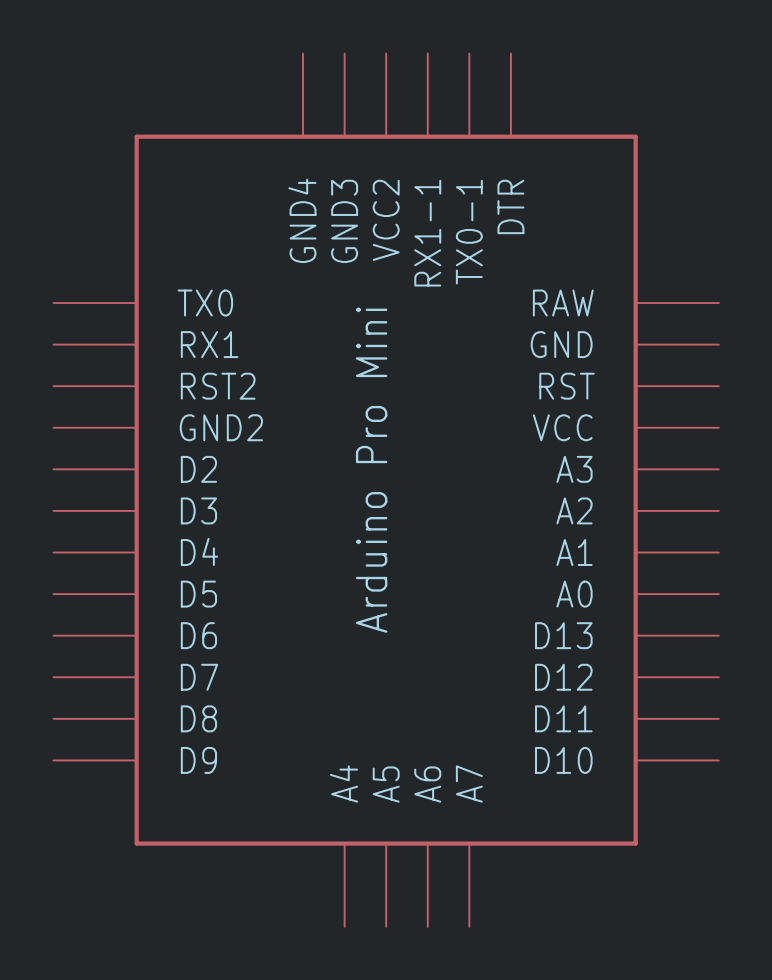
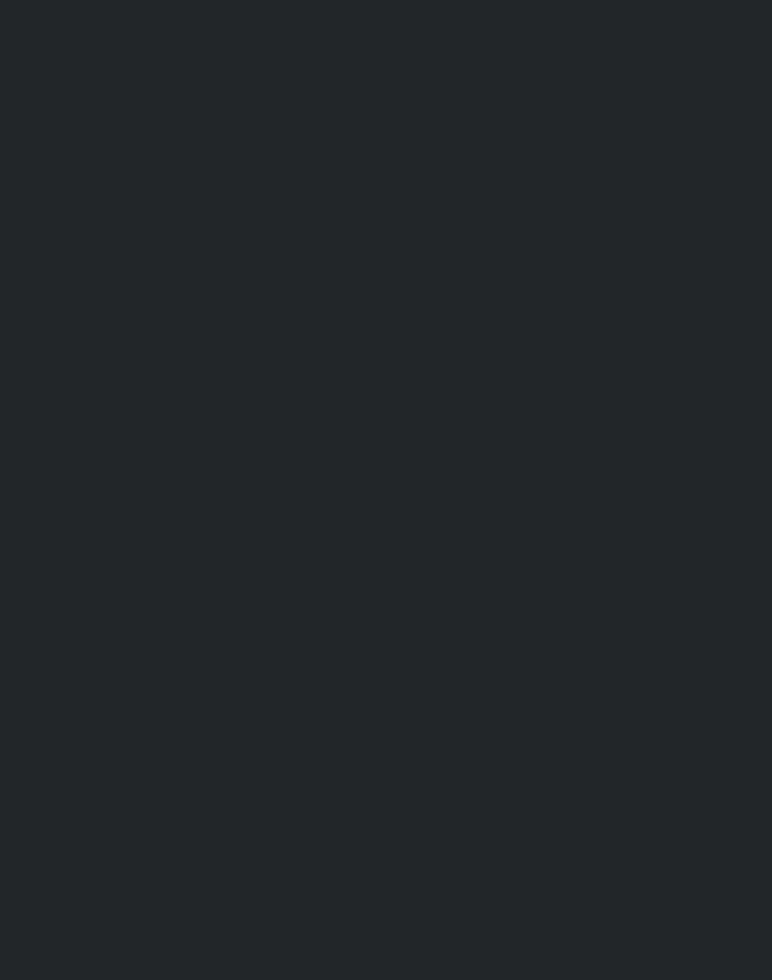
part: (386, 490) -> none

